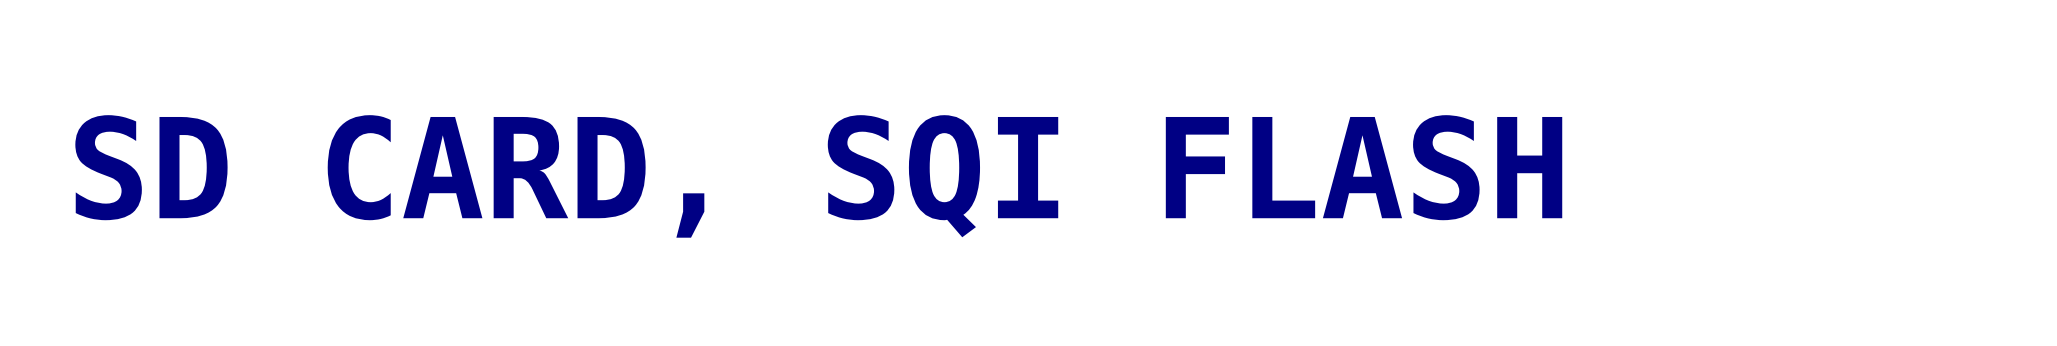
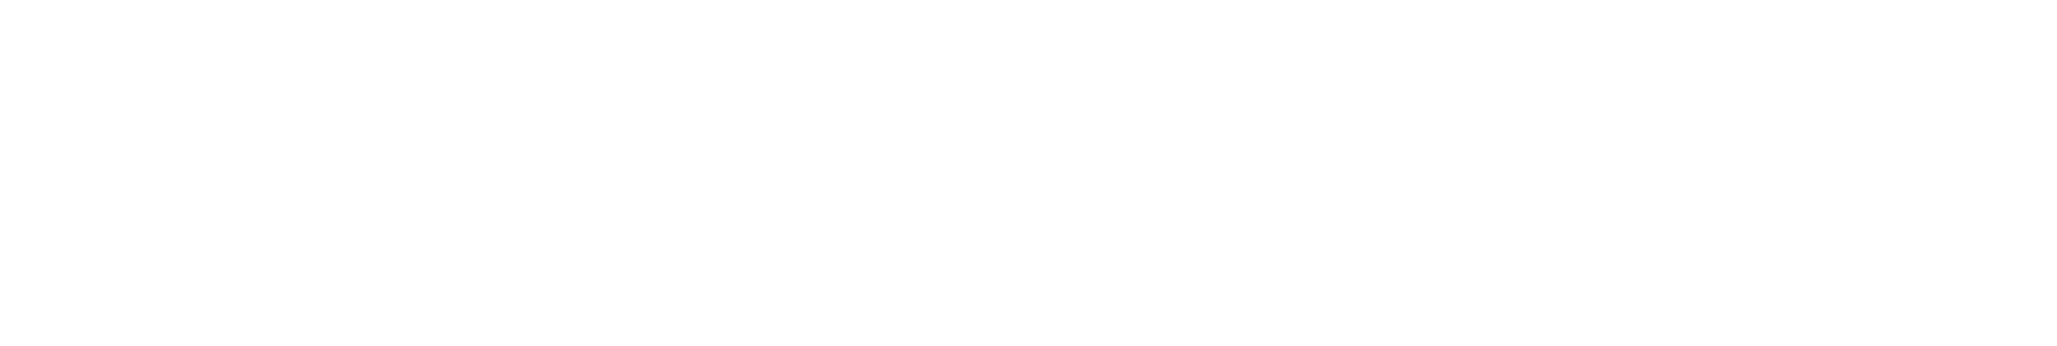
text: SD CARD, SQI FLASH (818, 176) -> none

